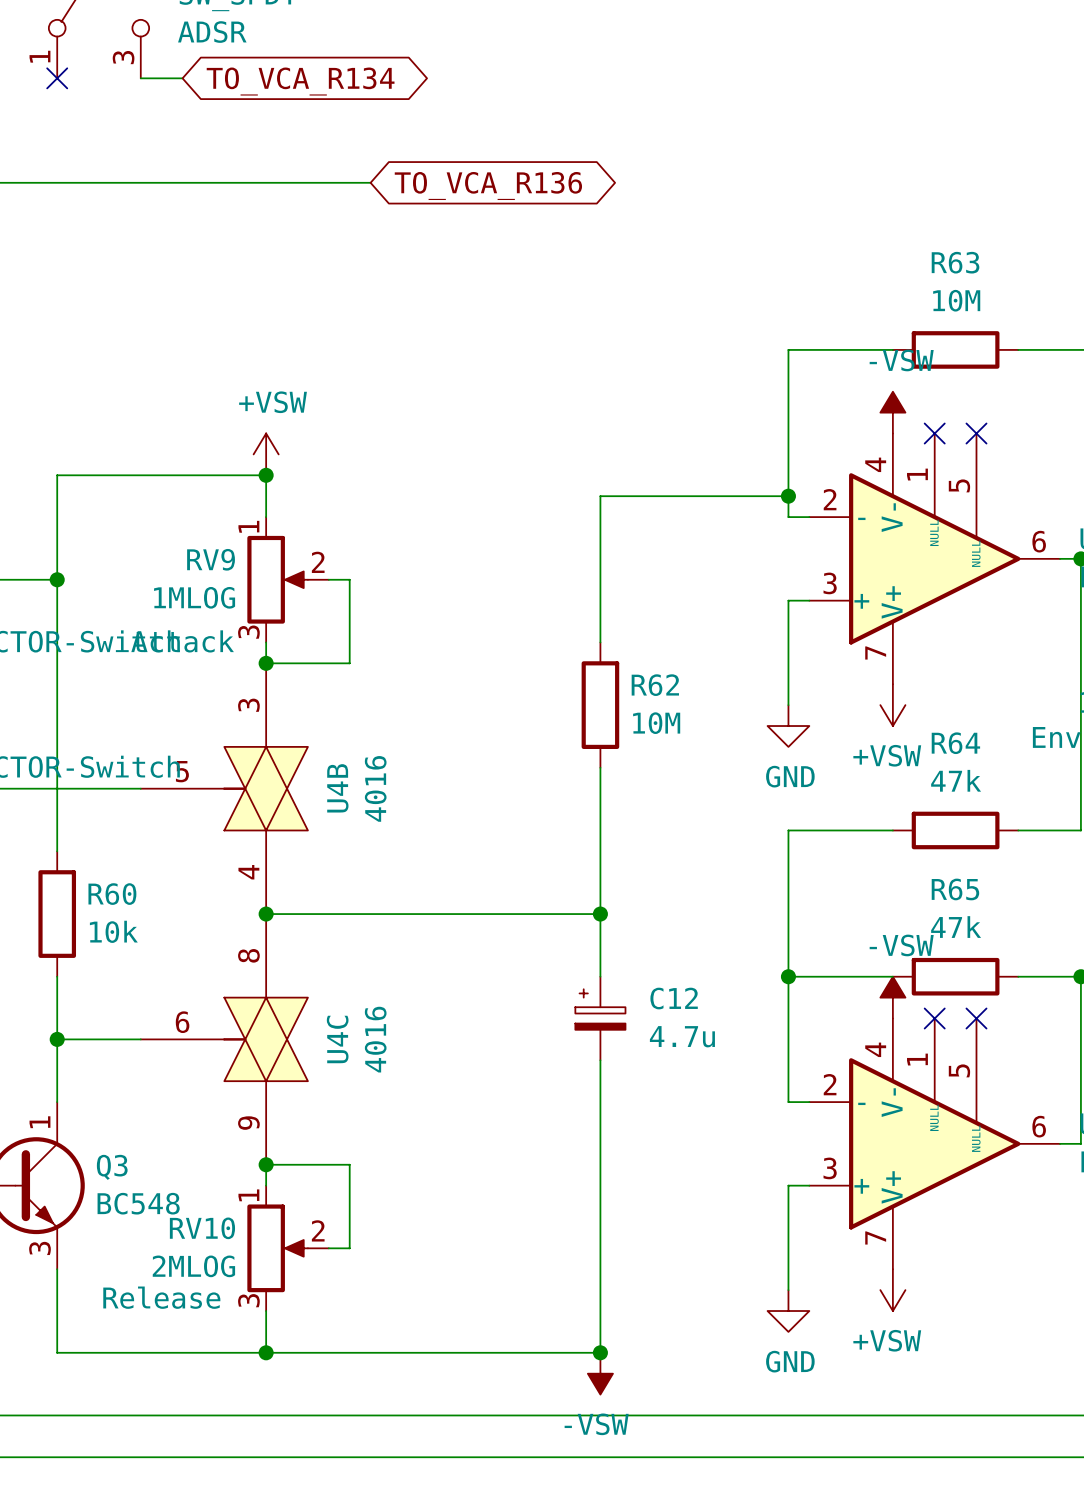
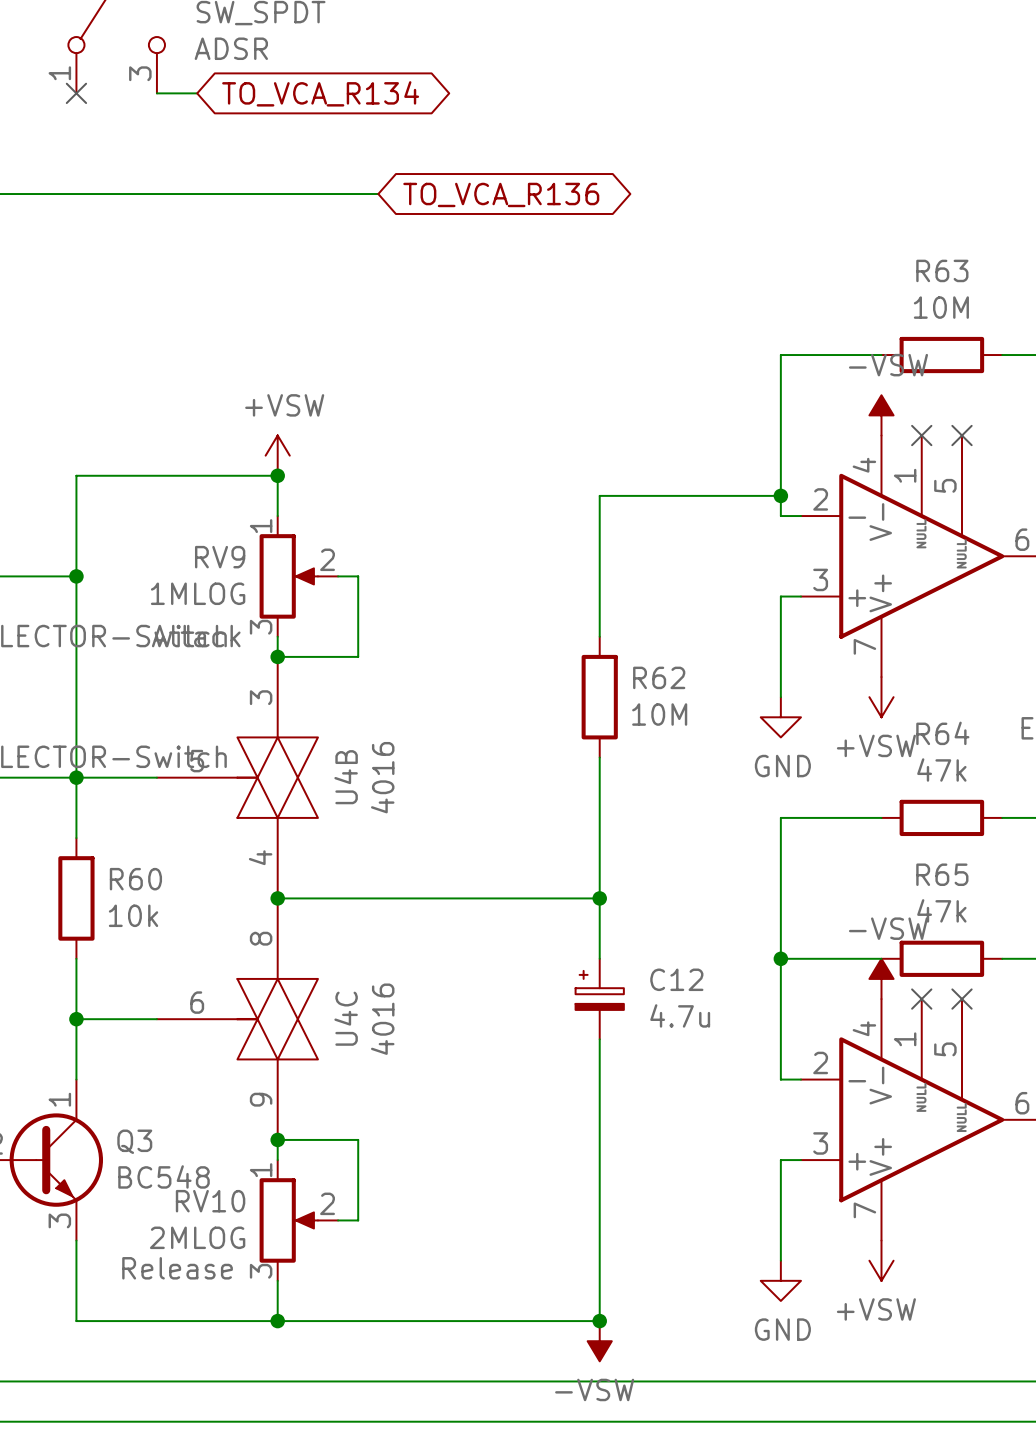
junction: none -> (76, 777)

